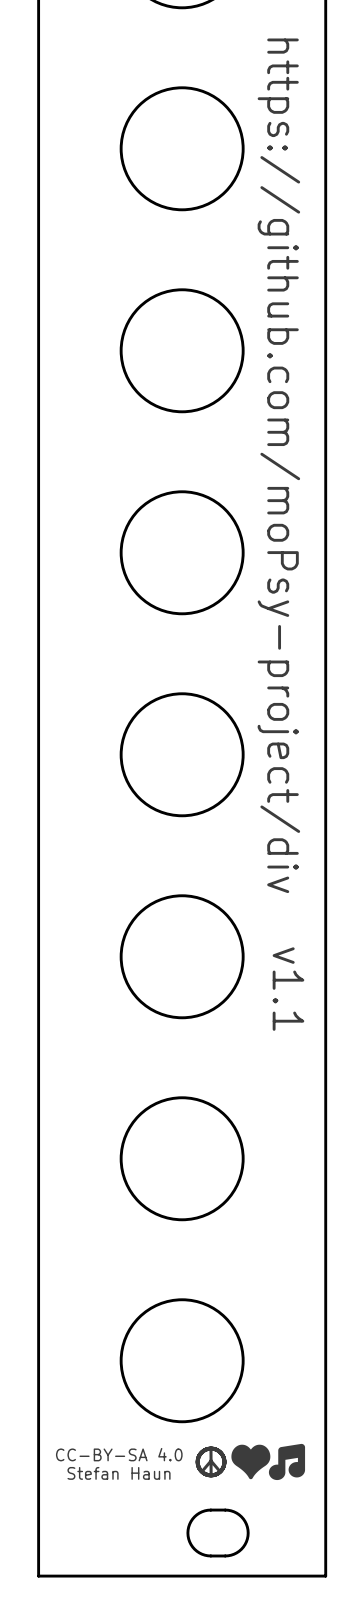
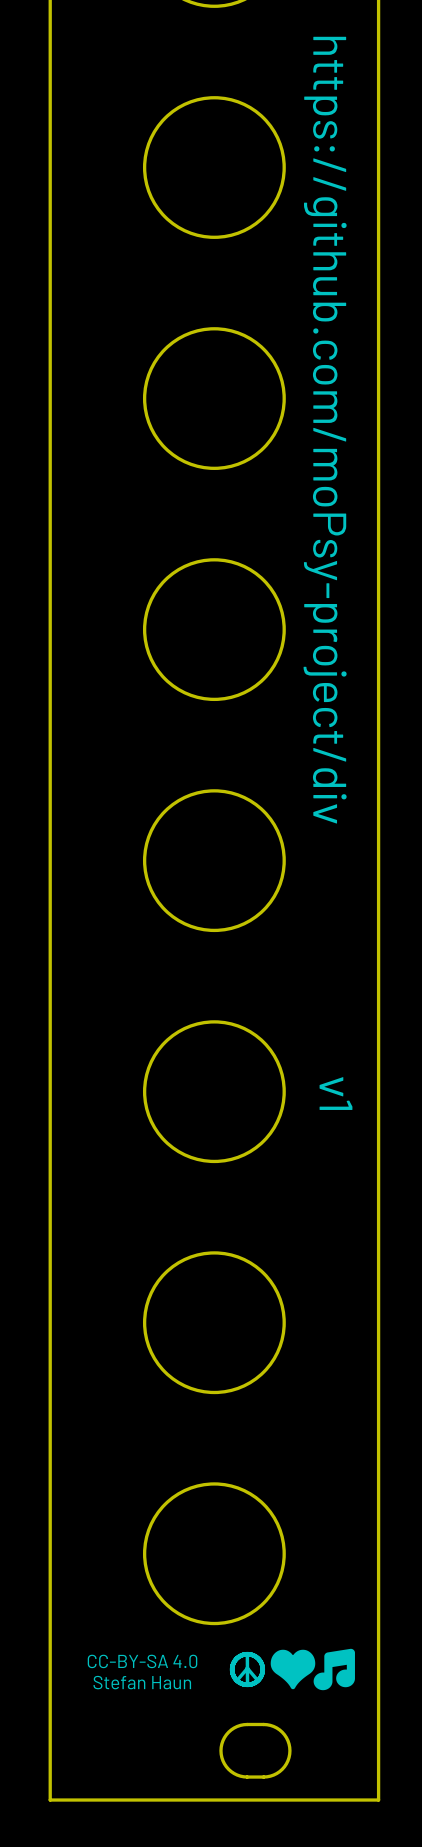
text: v1.1 (288, 989) -> v1 (336, 1093)

